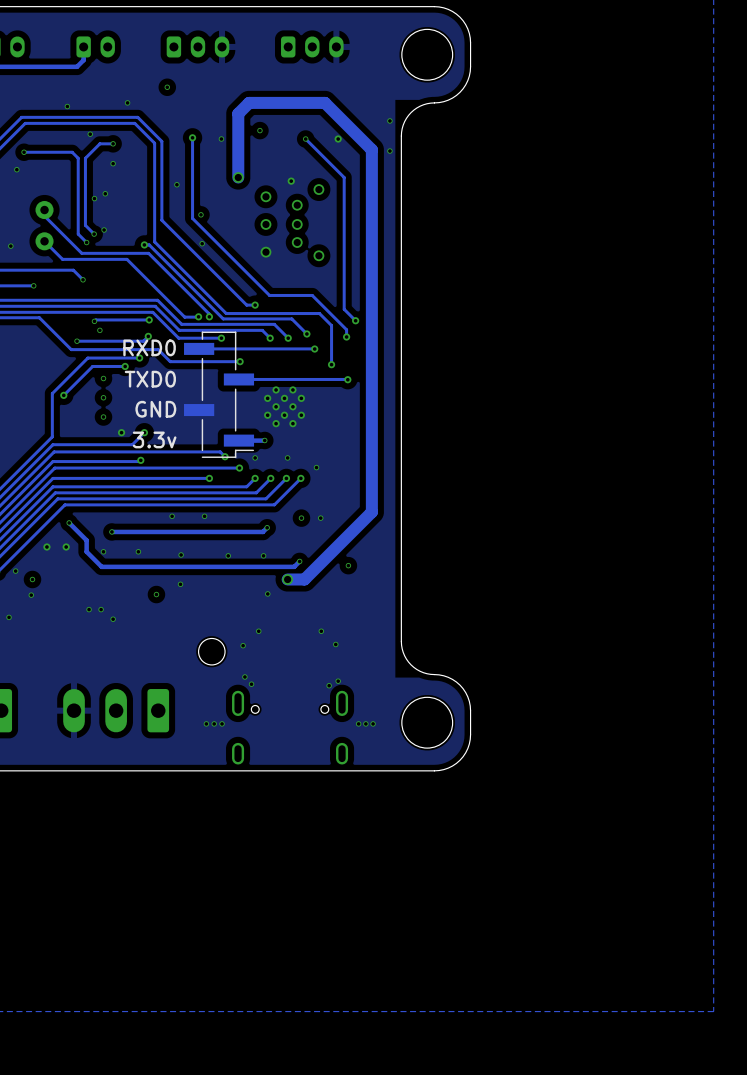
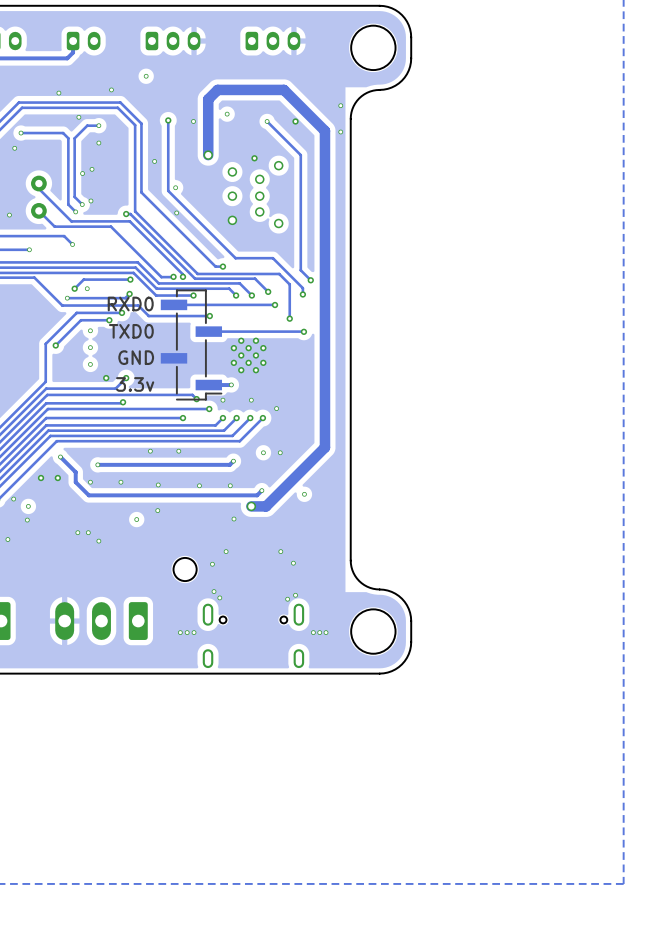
track: none -> (82, 280) (74, 288)
via: (94, 321) -> none
via: none -> (74, 288)

